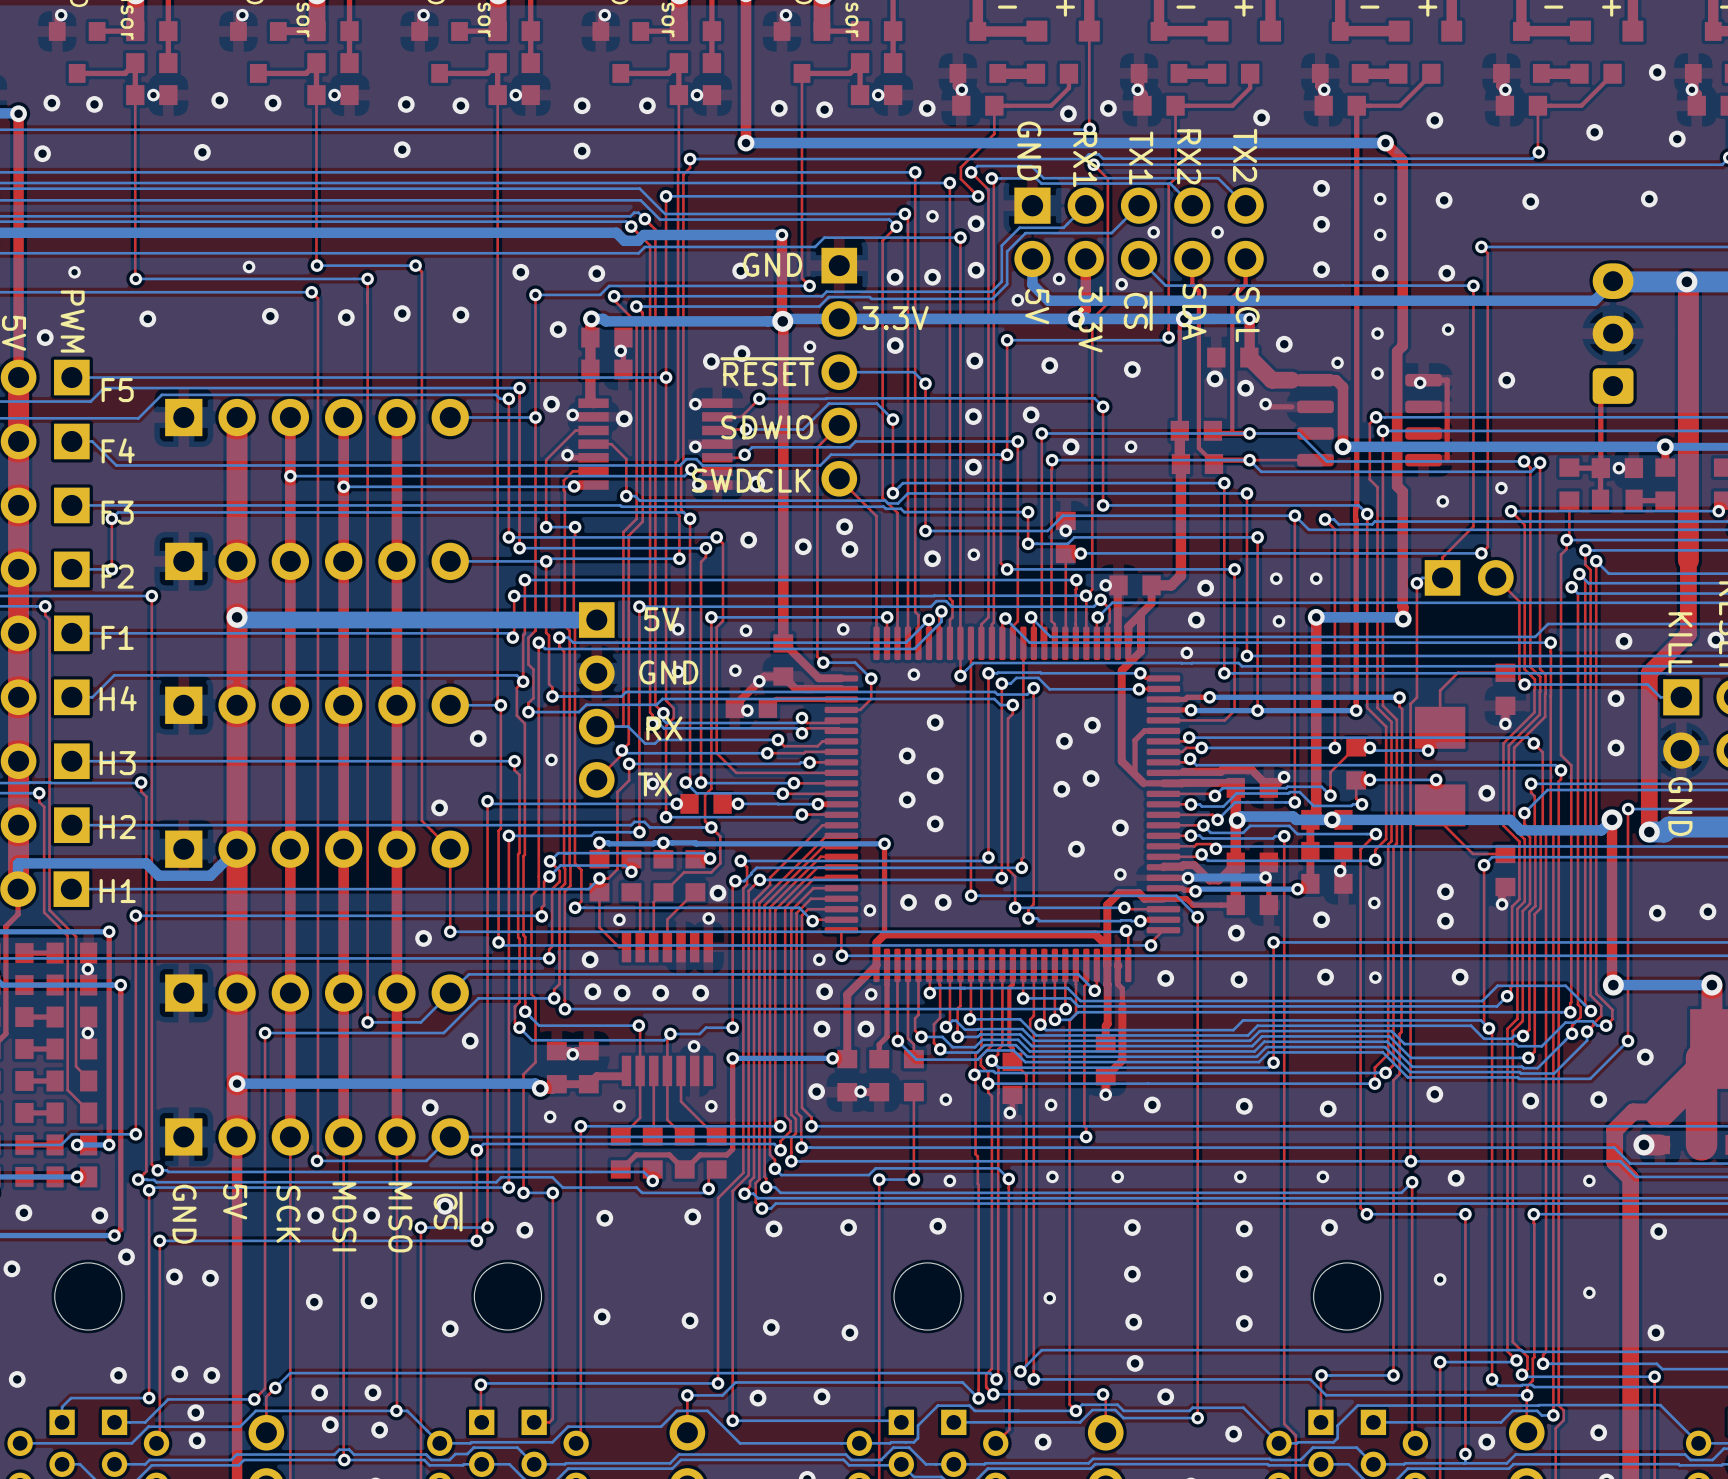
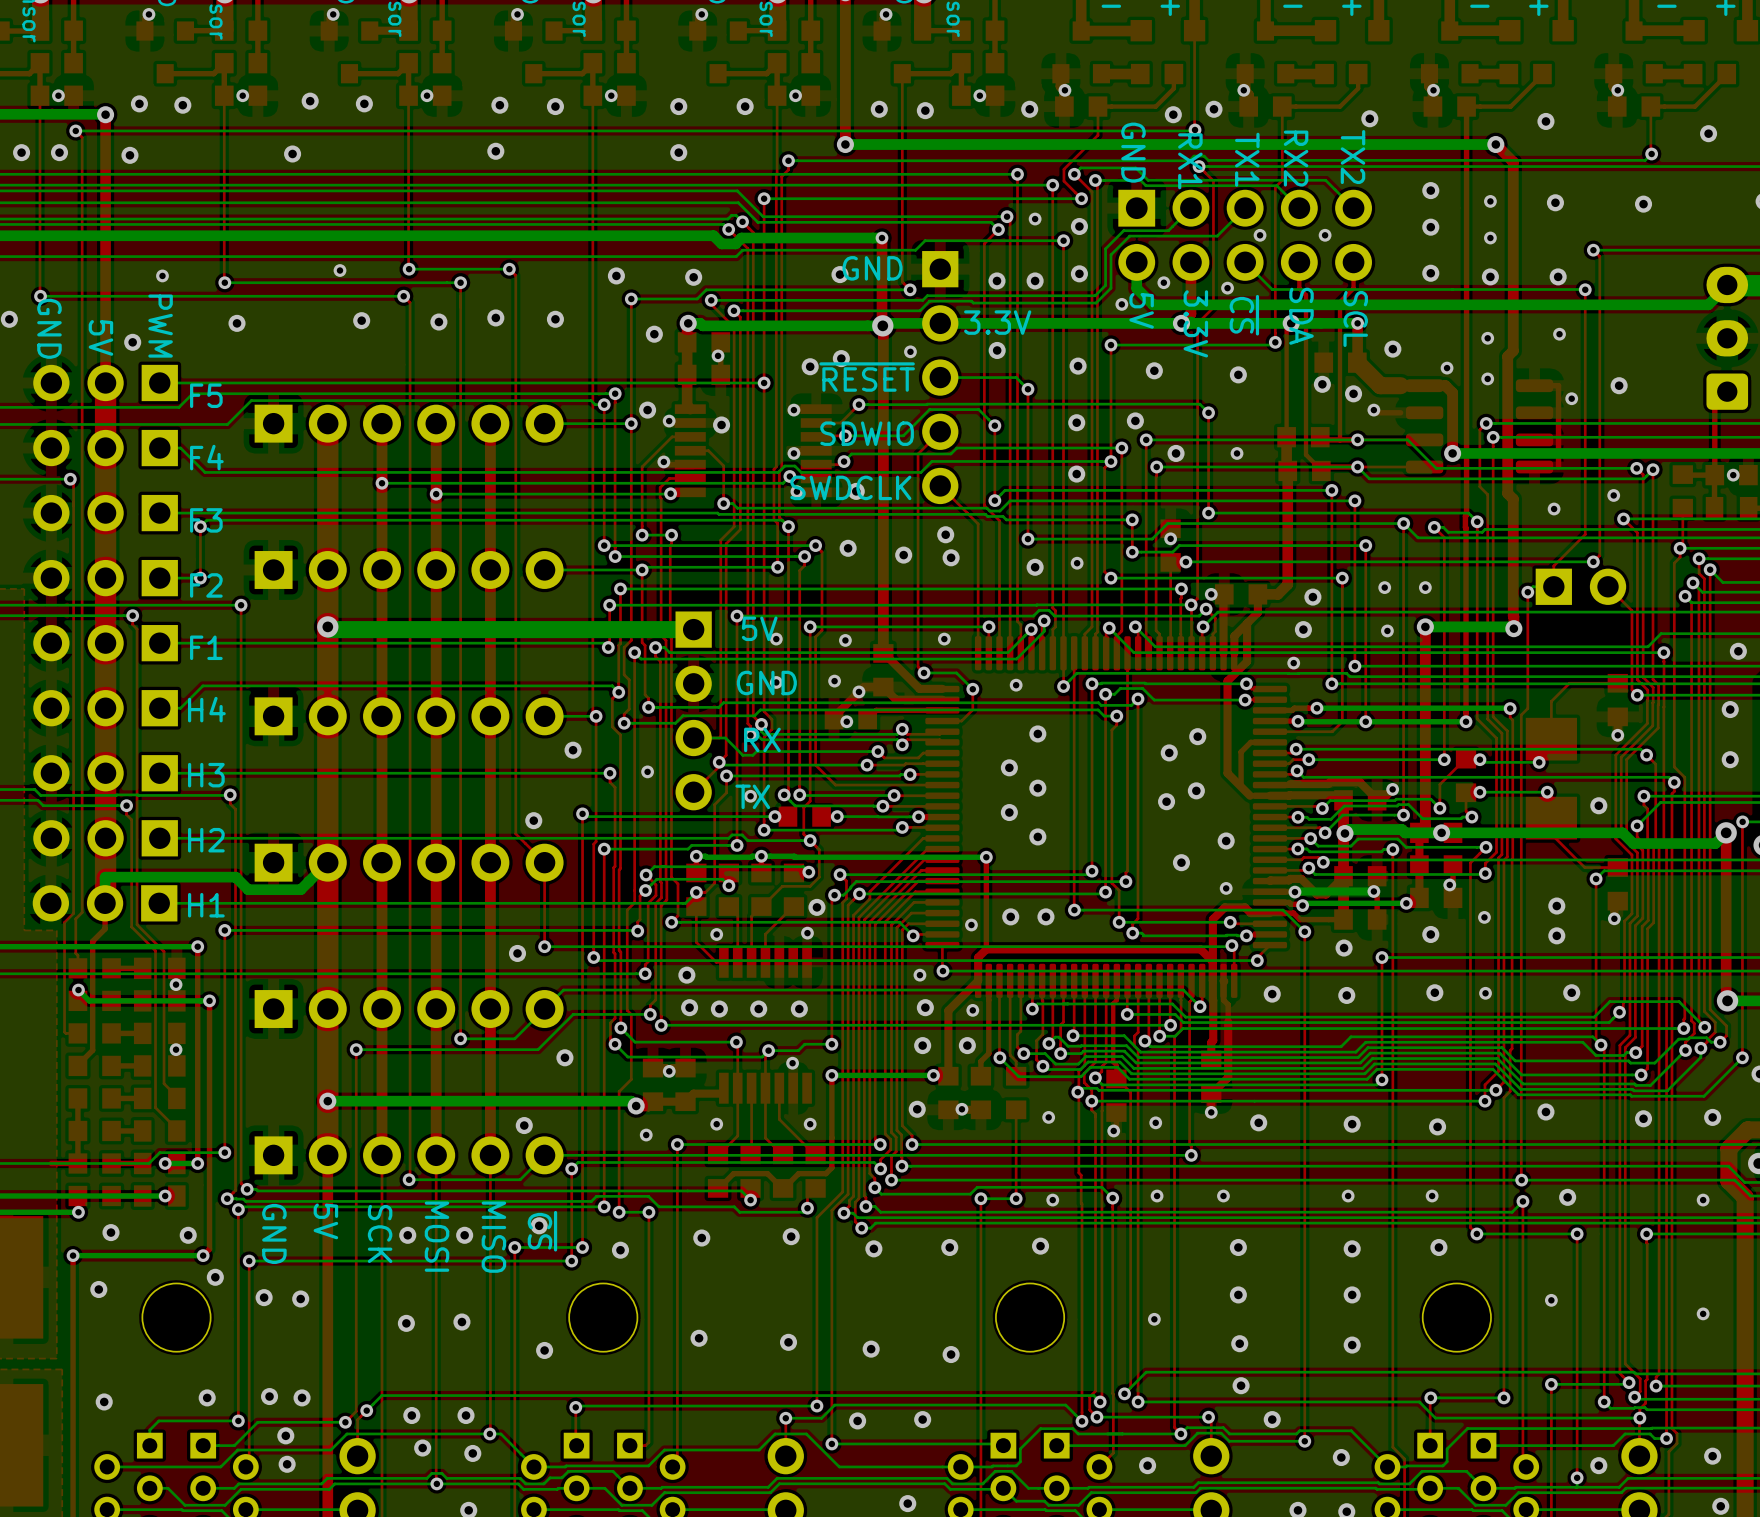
via position: (1420, 382) -> (1571, 398)

